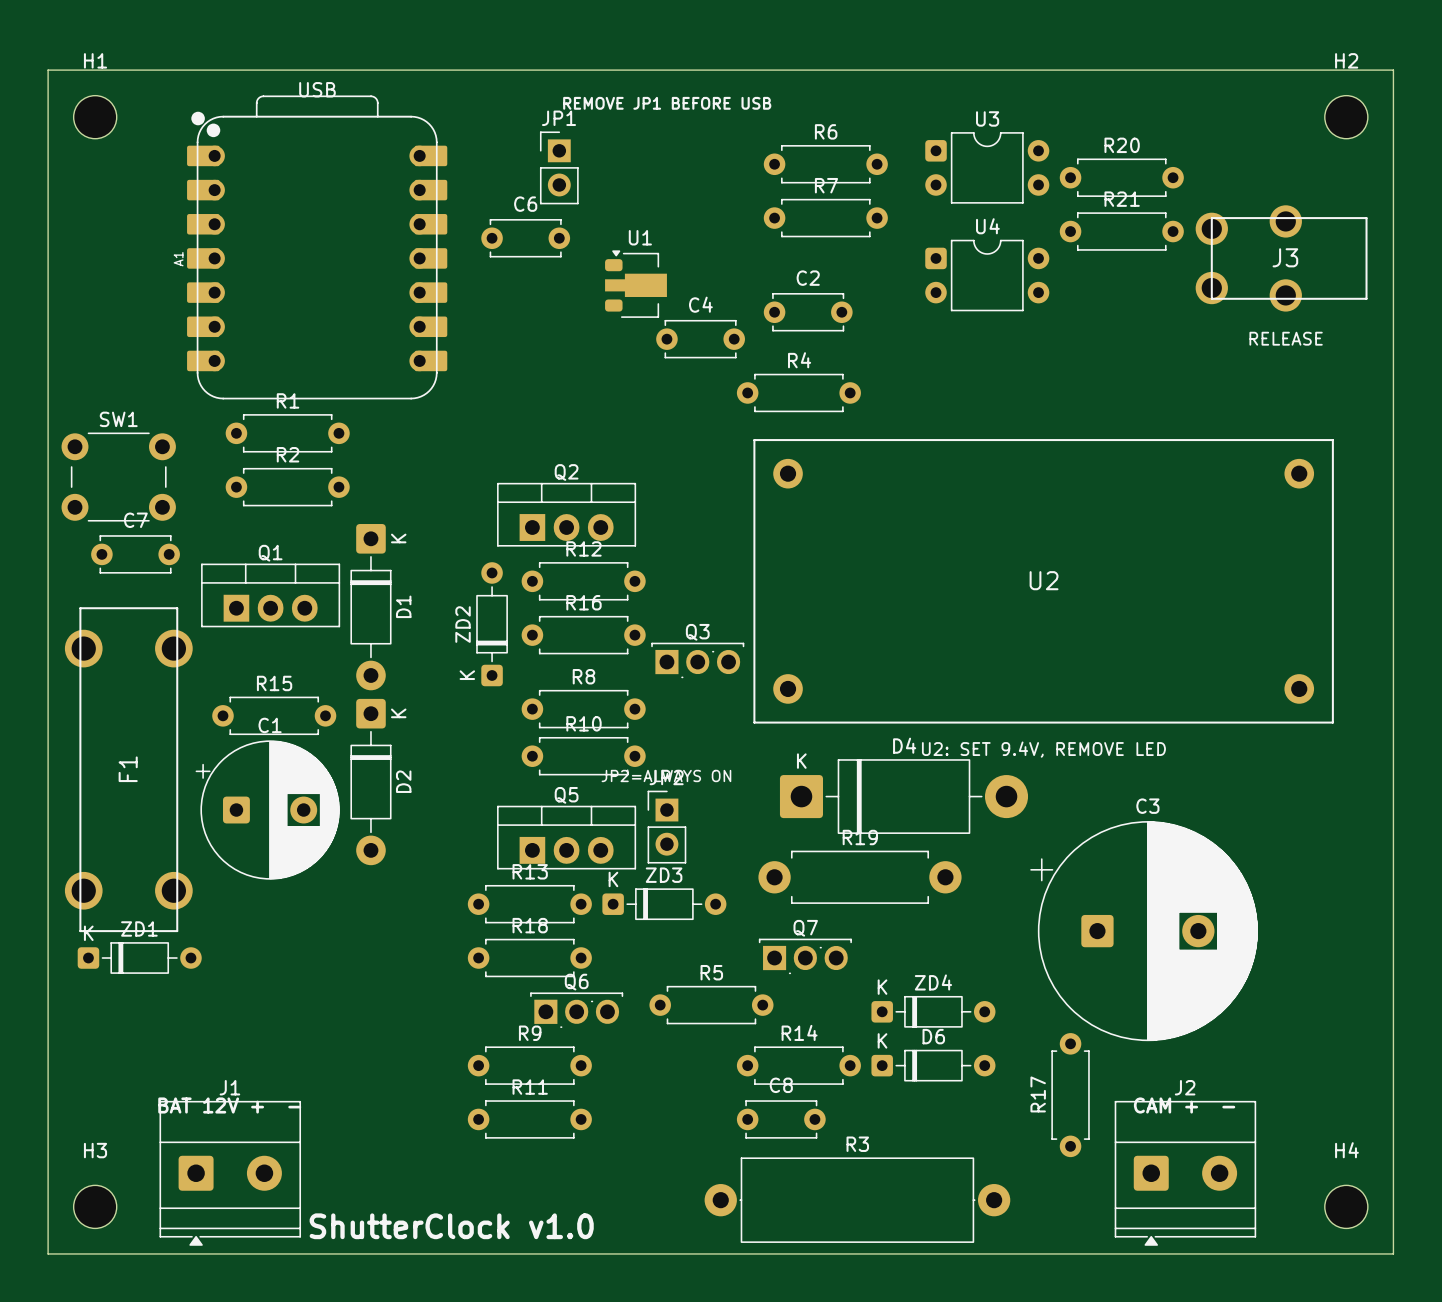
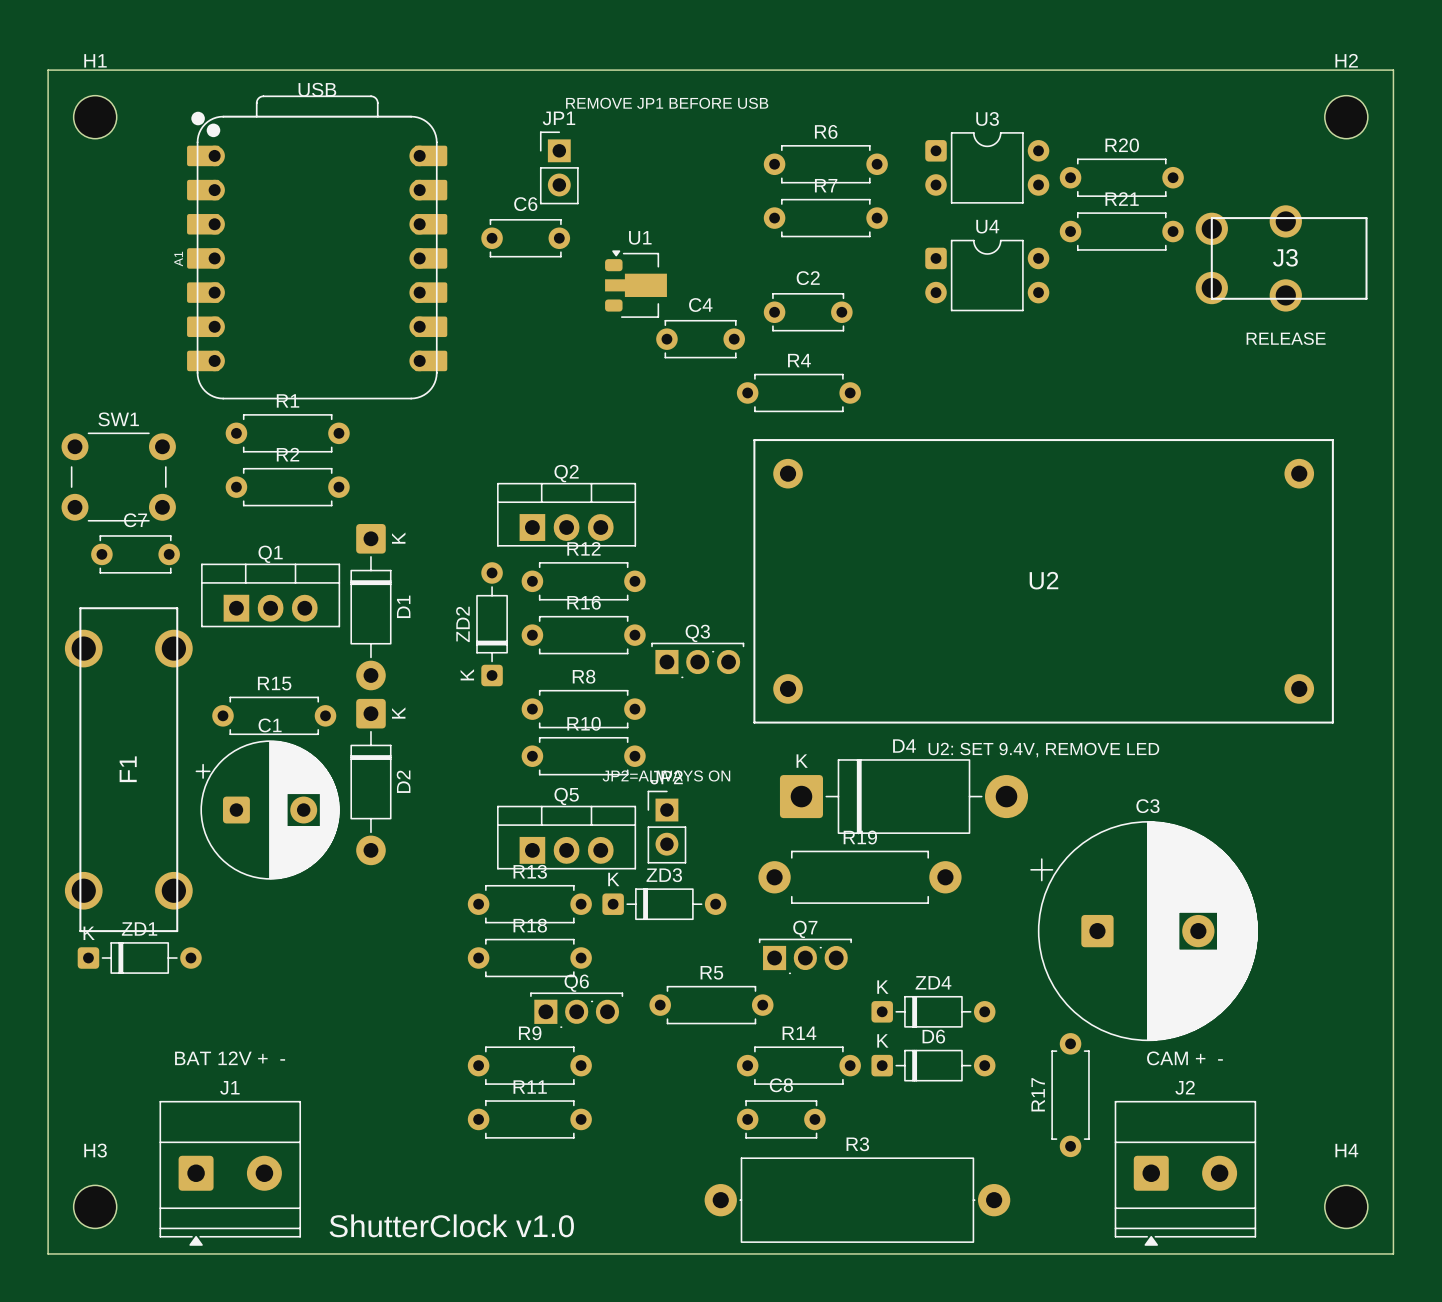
text position: BAT 12V + - (229, 1105) -> BAT 12V + - (230, 1058)
text position: CAM + - (1184, 1105) -> CAM + - (1184, 1058)

